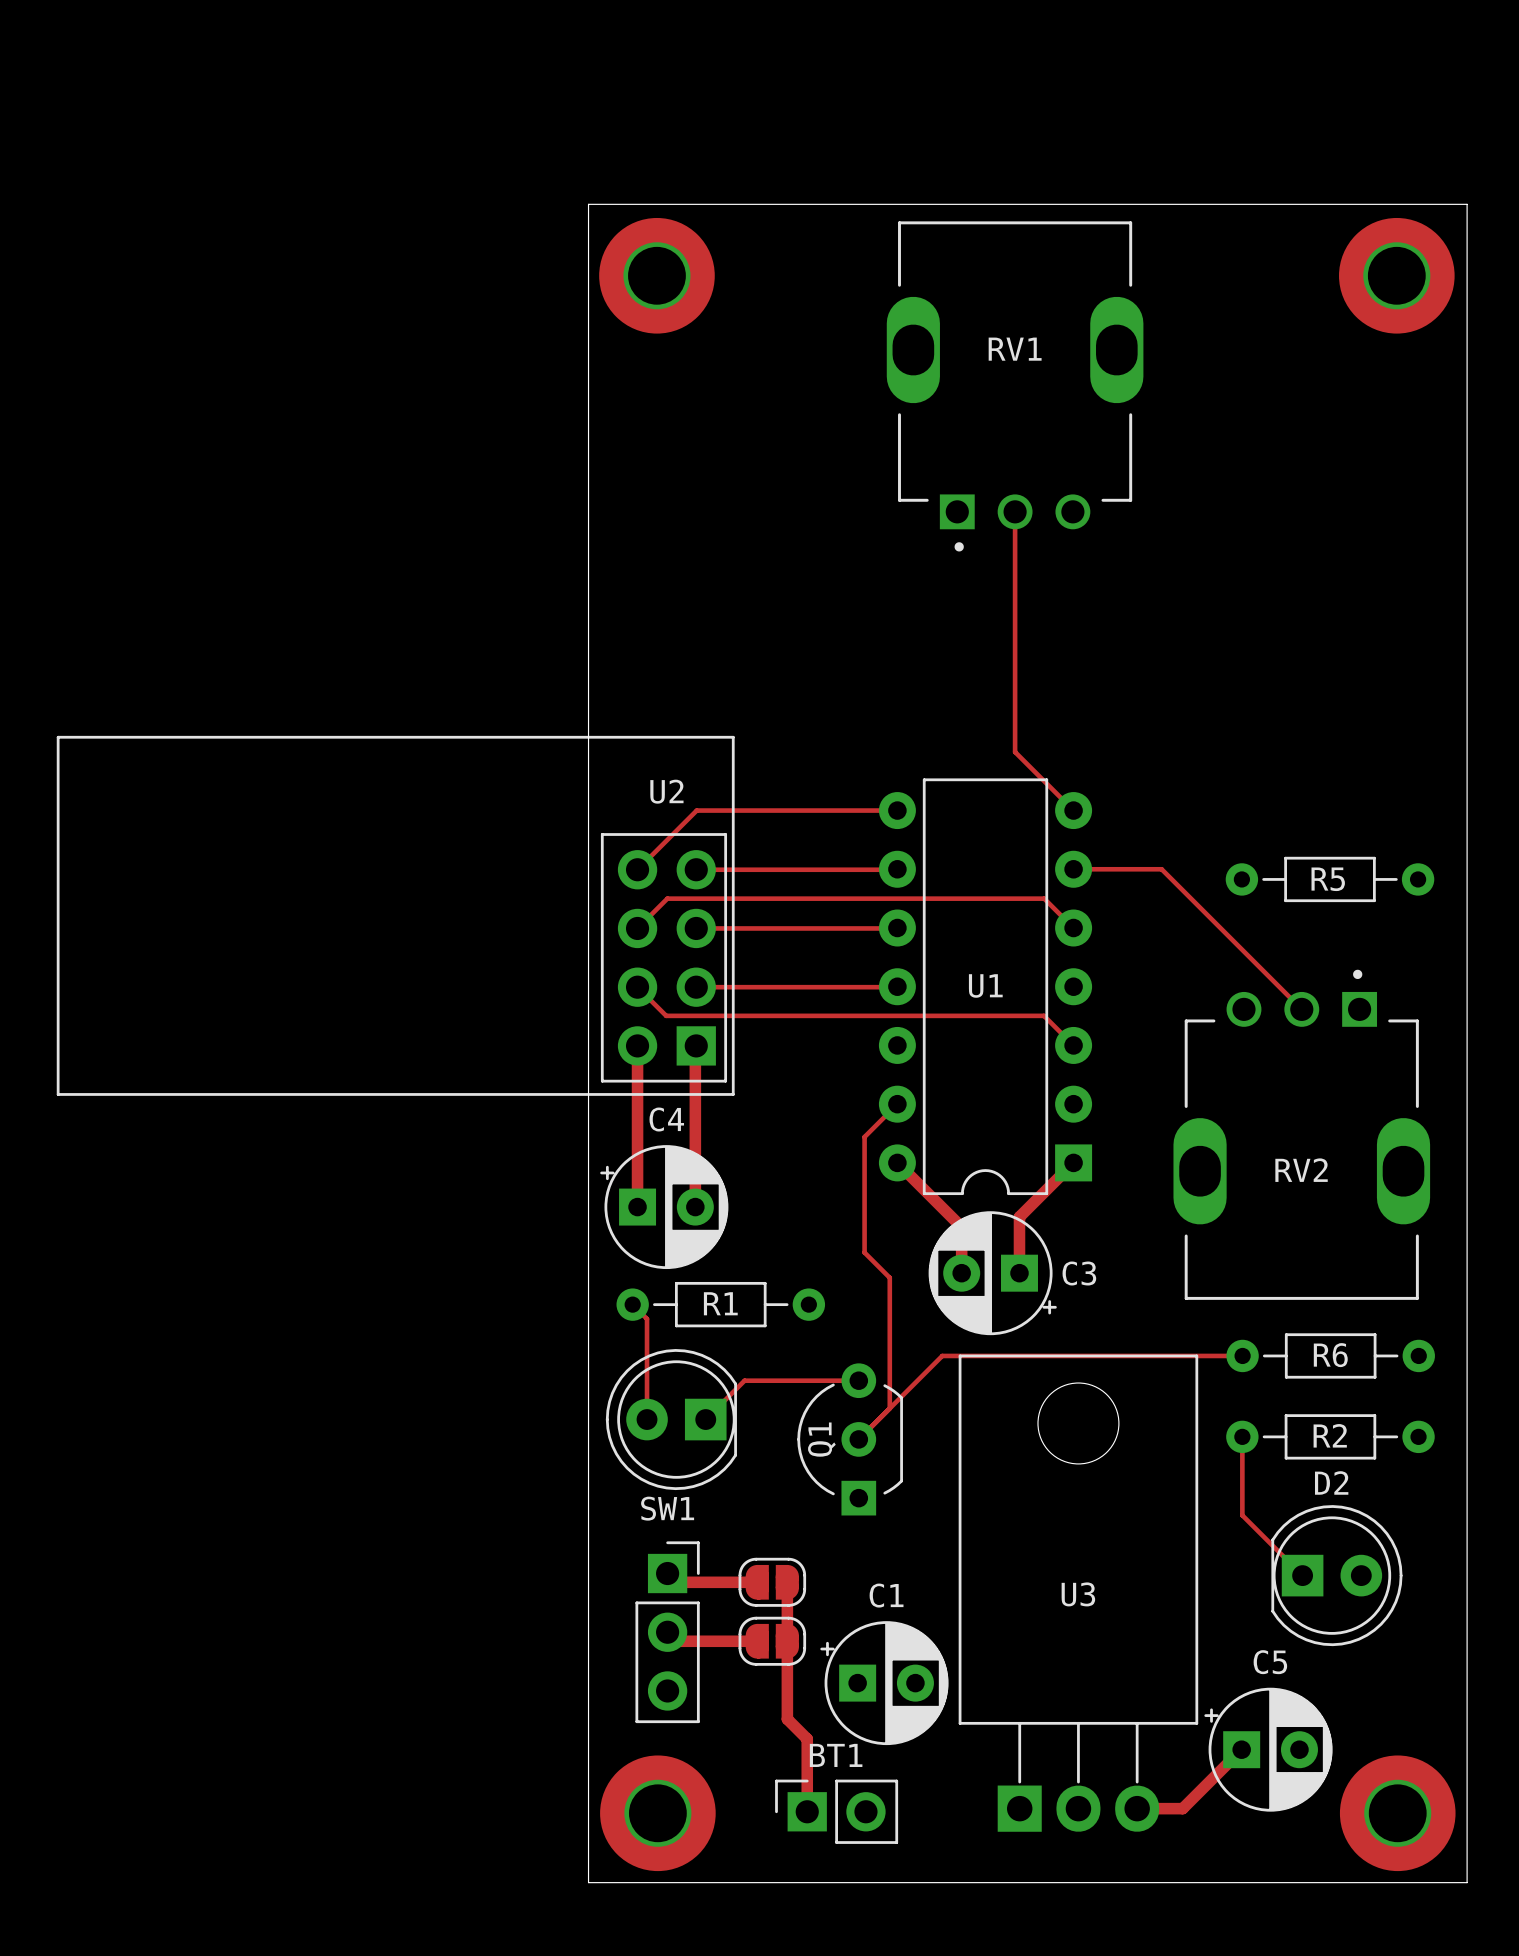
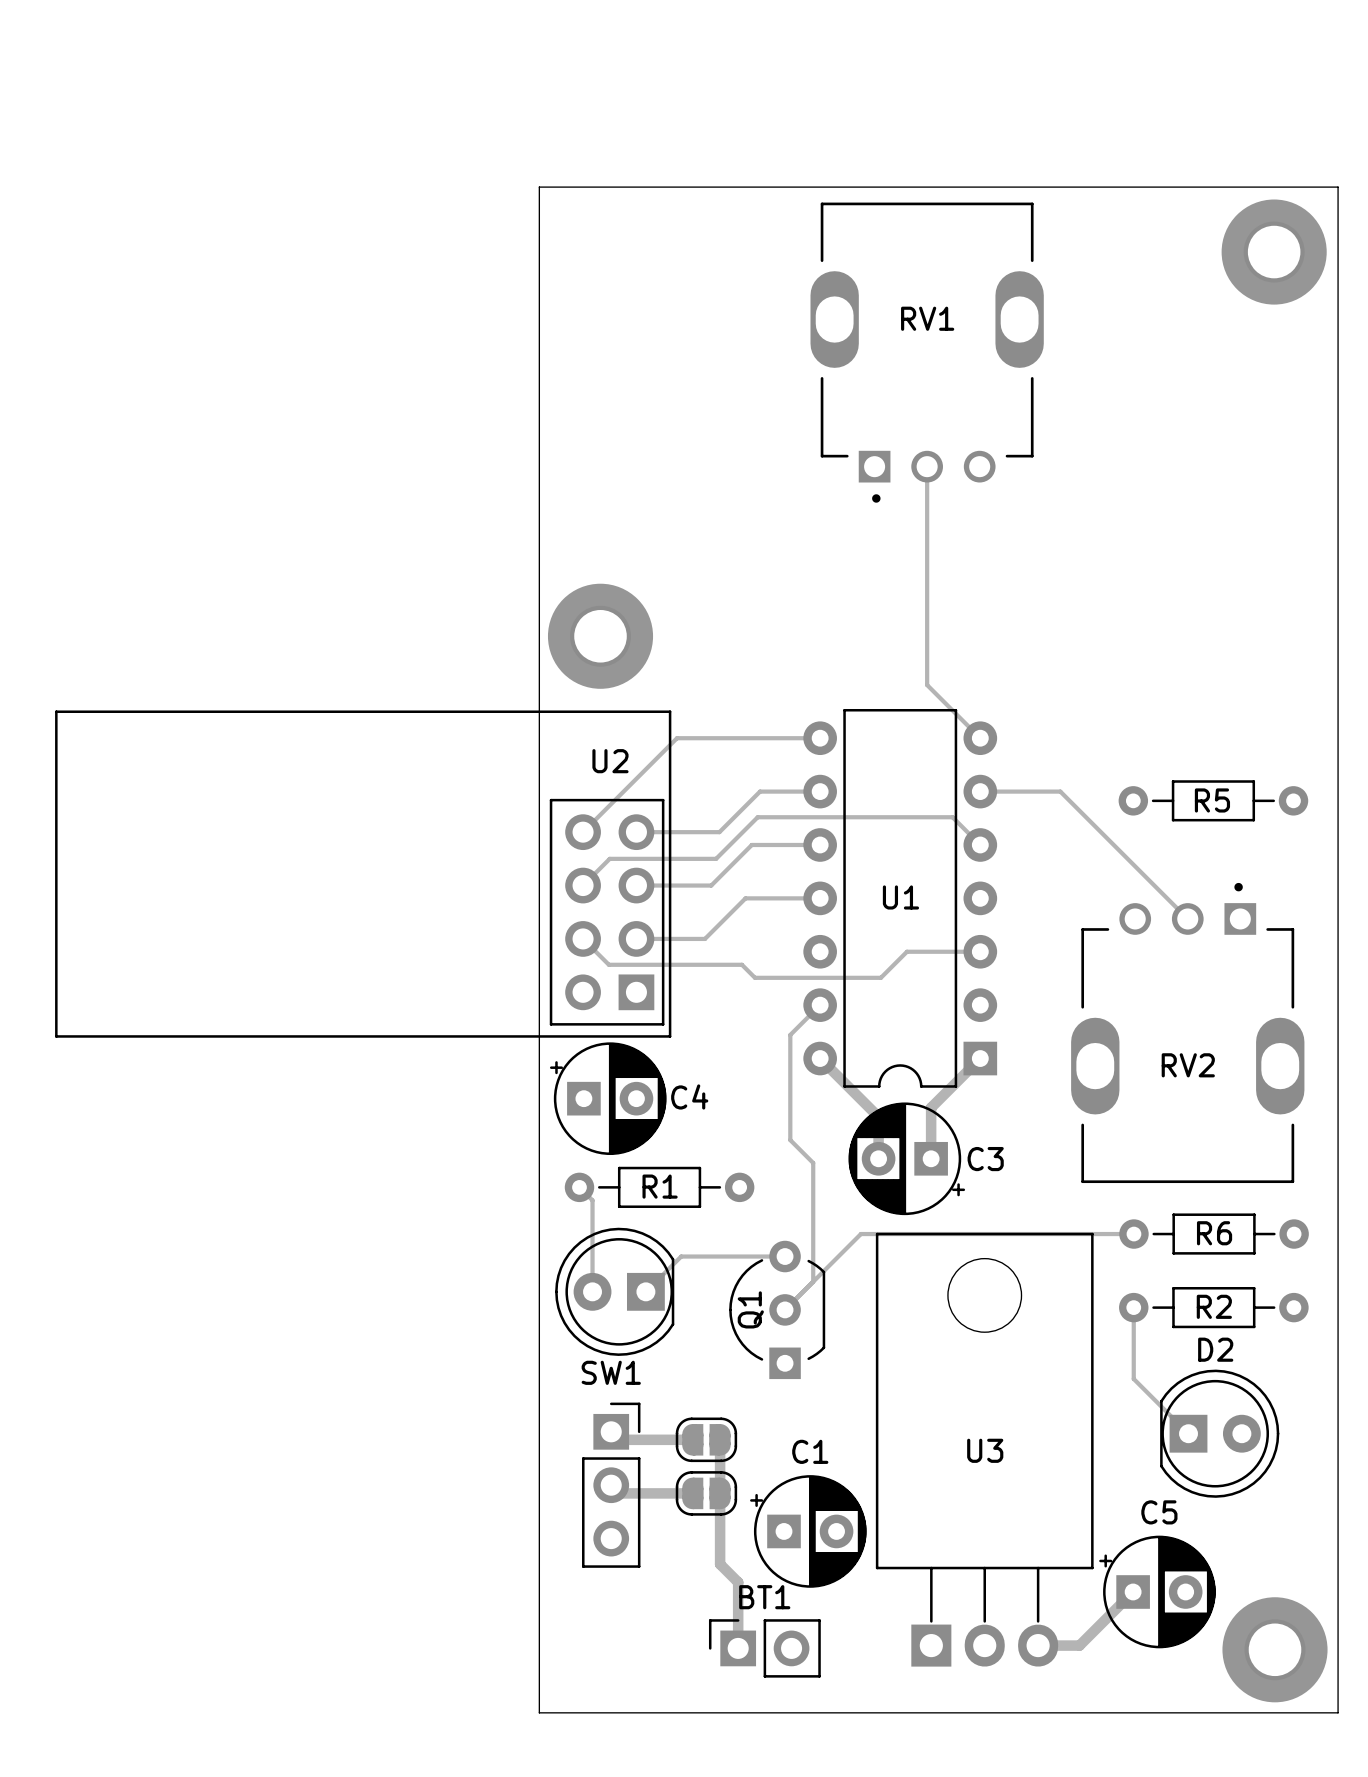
part position: (656, 275) -> (600, 636)
track: (739, 810) (696, 810) (637, 869) -> (677, 738) (583, 832)
track: (897, 869) (696, 869) -> (820, 791) (760, 791) (719, 832) (636, 832)
track: (1044, 898) (667, 898) (637, 928) -> (953, 818) (757, 817) (716, 858) (609, 858) (583, 885)
U2 position: (395, 915) -> (363, 874)
track: (897, 928) (696, 928) -> (820, 844) (751, 844) (711, 885) (636, 885)
track: (897, 986) (696, 987) -> (820, 898) (745, 898) (704, 938) (636, 938)
track: (637, 987) (666, 1015) (1043, 1015) (1073, 1045) -> (583, 938) (608, 964) (741, 964) (755, 977) (880, 977) (906, 951) (980, 951)
track: (637, 1045) (637, 1207) -> none
track: (695, 1046) (695, 1207) -> none
C4 name position: C4 (666, 1119) -> C4 (689, 1096)
part: (657, 1813) -> none

